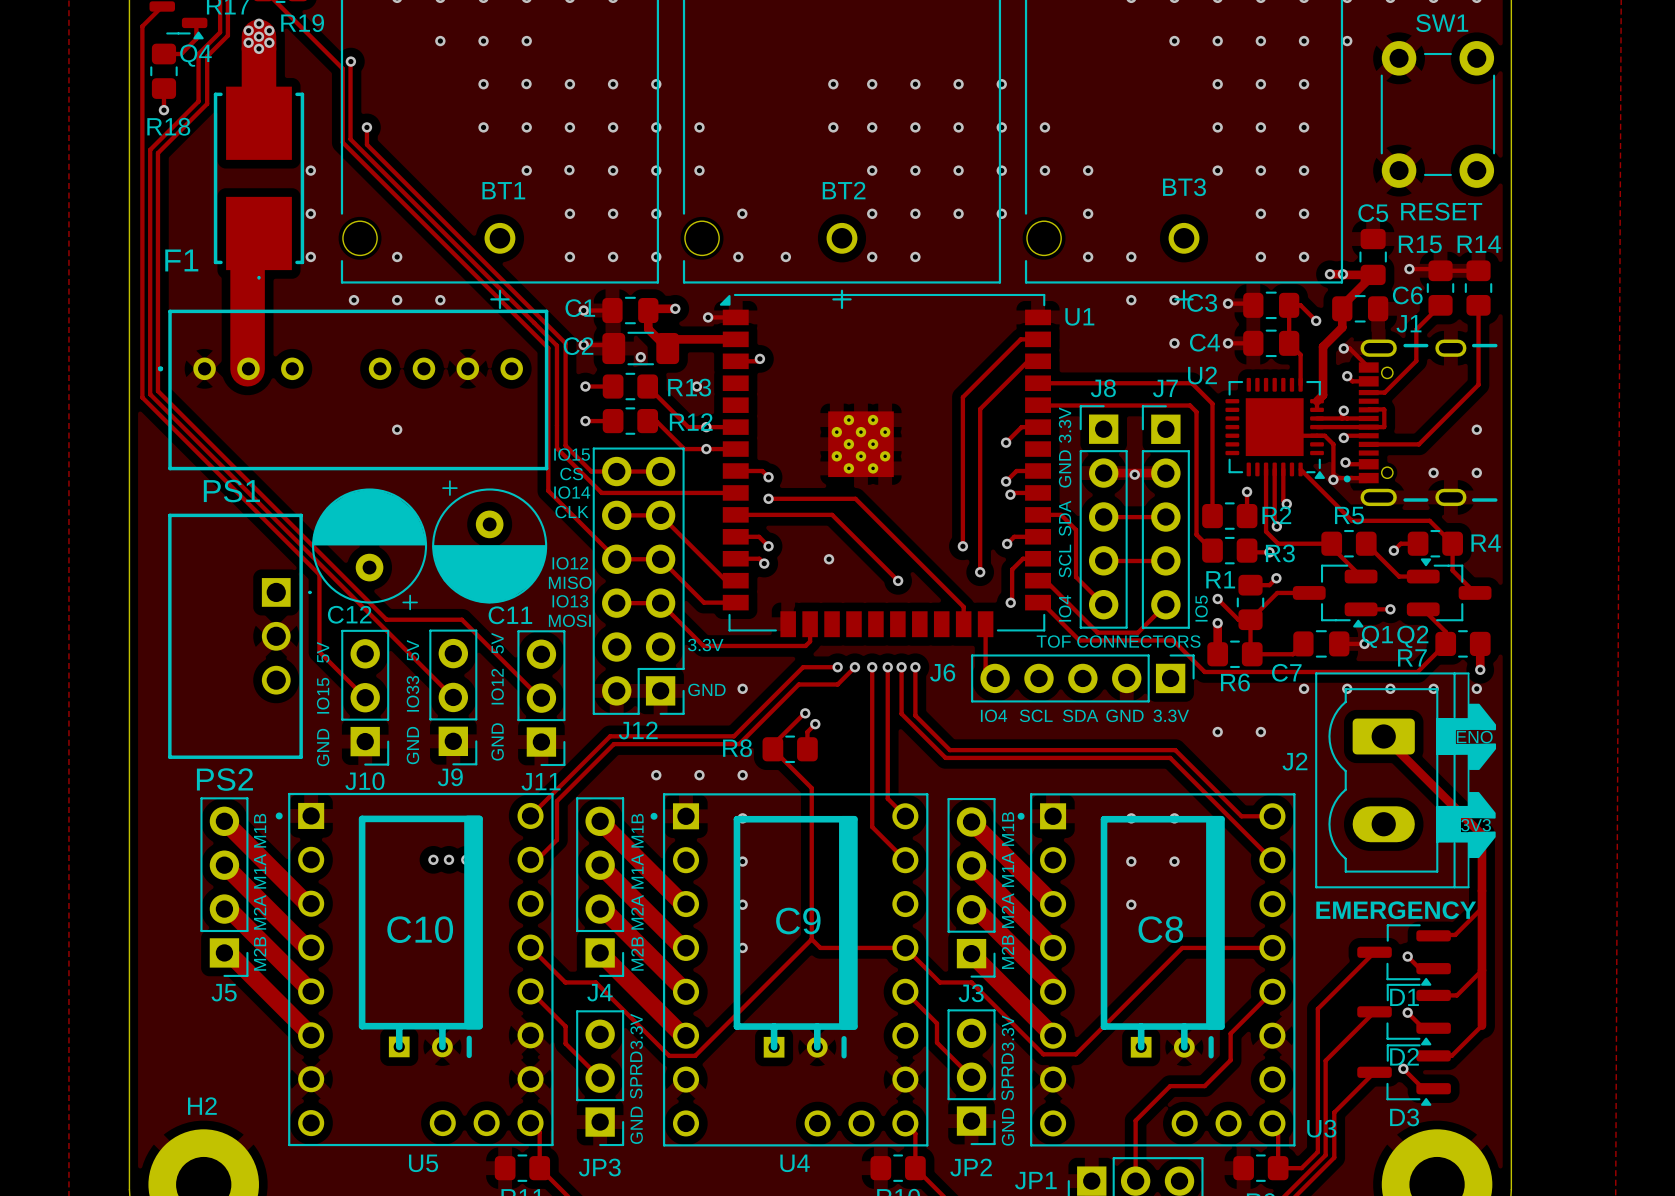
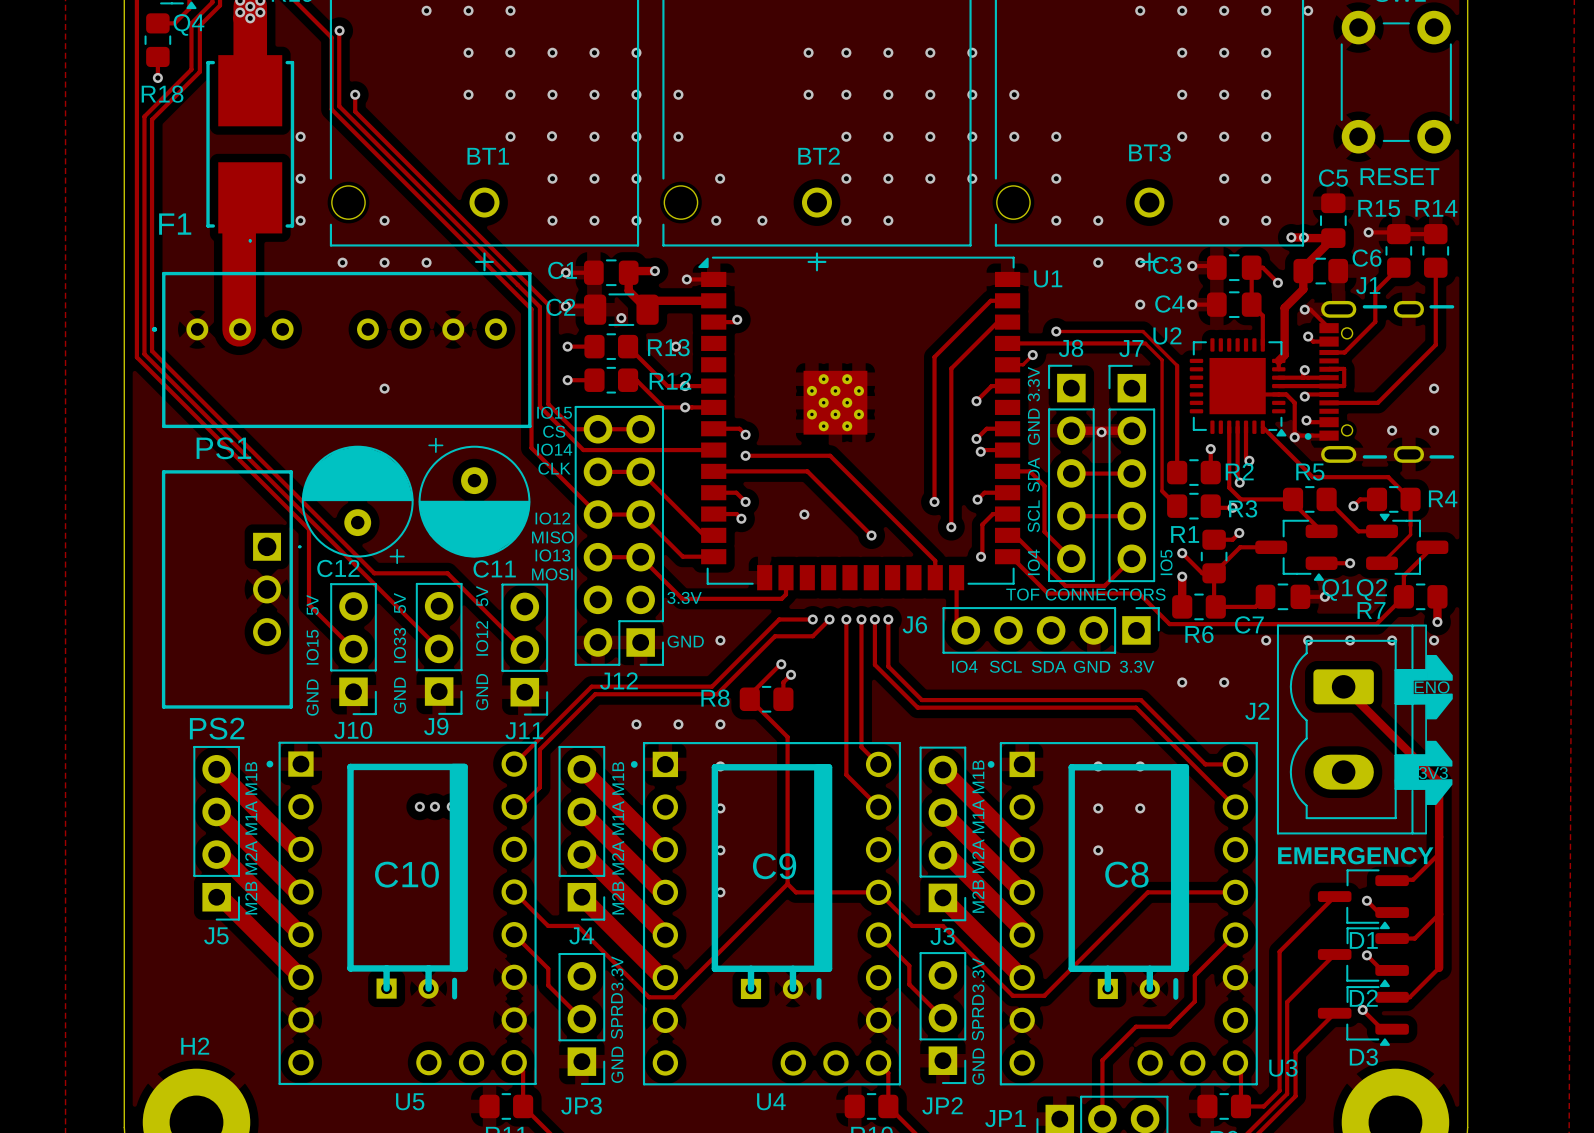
via: none -> (1056, 331)
track: (1179, 383) (1191, 383) (1212, 403) (1212, 406) -> (1056, 331) (1143, 331) (1177, 365)
track: none -> (1032, 355) (1023, 364) (1007, 364)
via: none -> (1032, 355)
track: (1038, 405) (1190, 405) (1196, 411) (1196, 535) -> (1145, 343) (1162, 360) (1162, 491)
track: (1452, 570) (1475, 592) -> (1410, 525) (1410, 534) (1382, 563)
track: (1423, 609) (1445, 631) -> (1432, 547) (1403, 575) (1403, 585)

